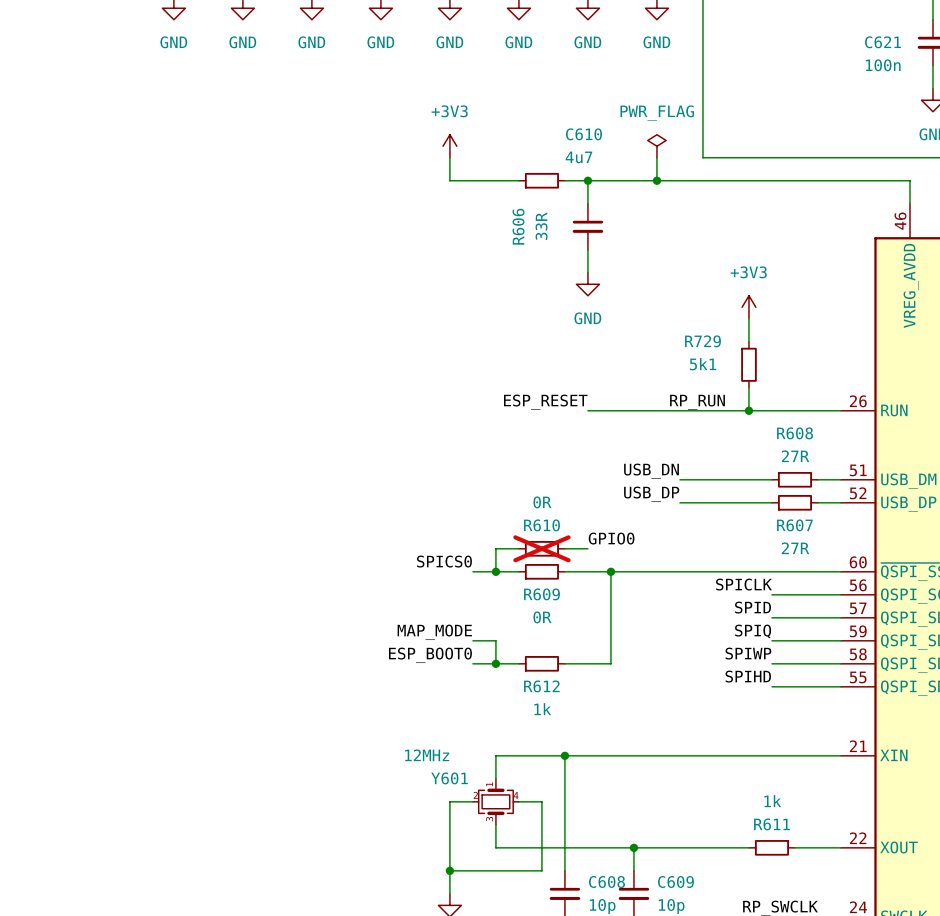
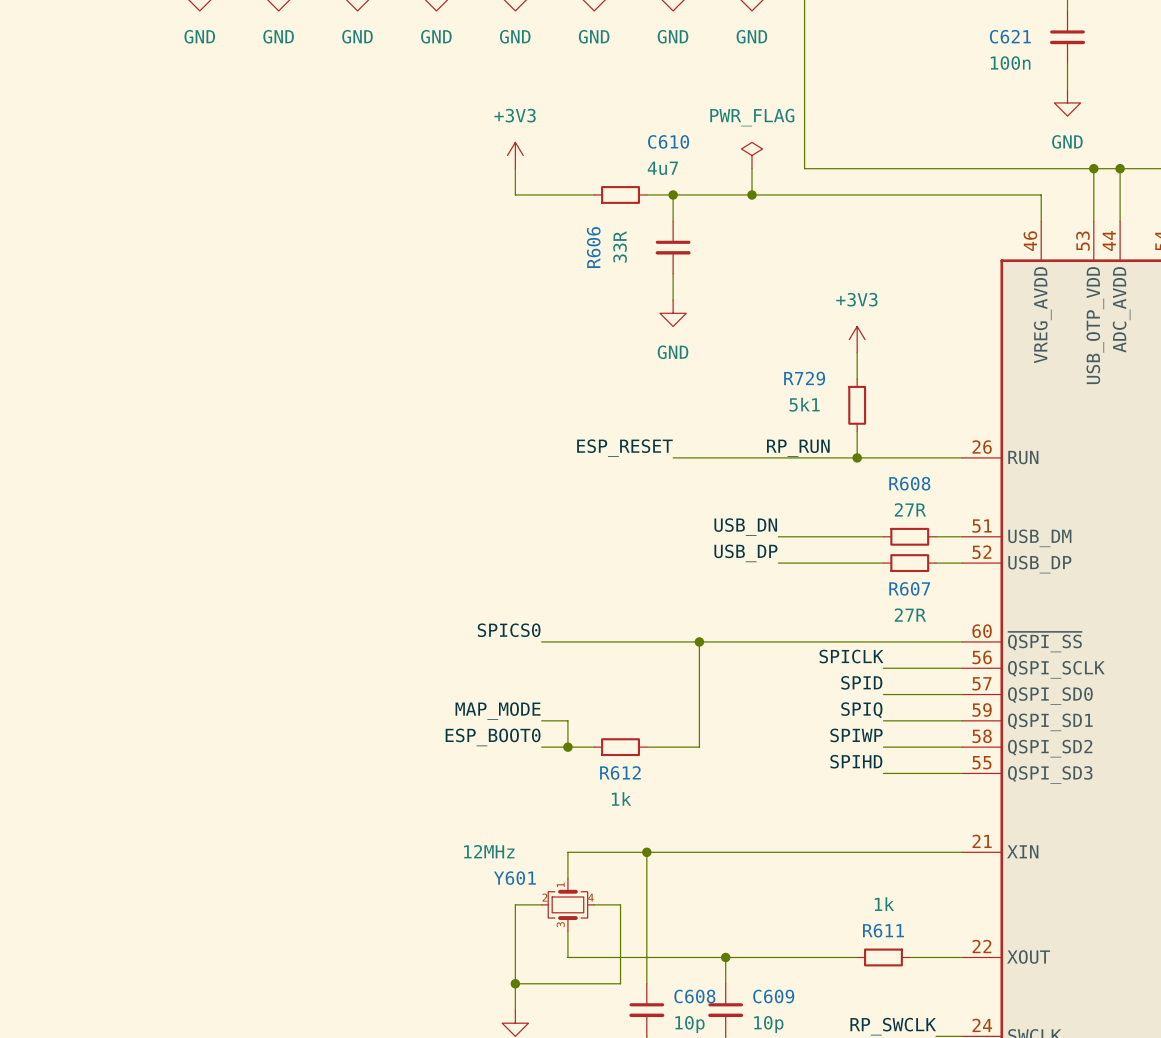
label: GPIO0 (611, 538) -> none
wire: (518, 548) (495, 548) (495, 571) -> none
R610: 0R (541, 548) -> none
wire: (564, 548) (587, 548) -> none
junction: (495, 571) -> none
wire: none -> (594, 641) (646, 641)
R609: 0R (541, 571) -> none

